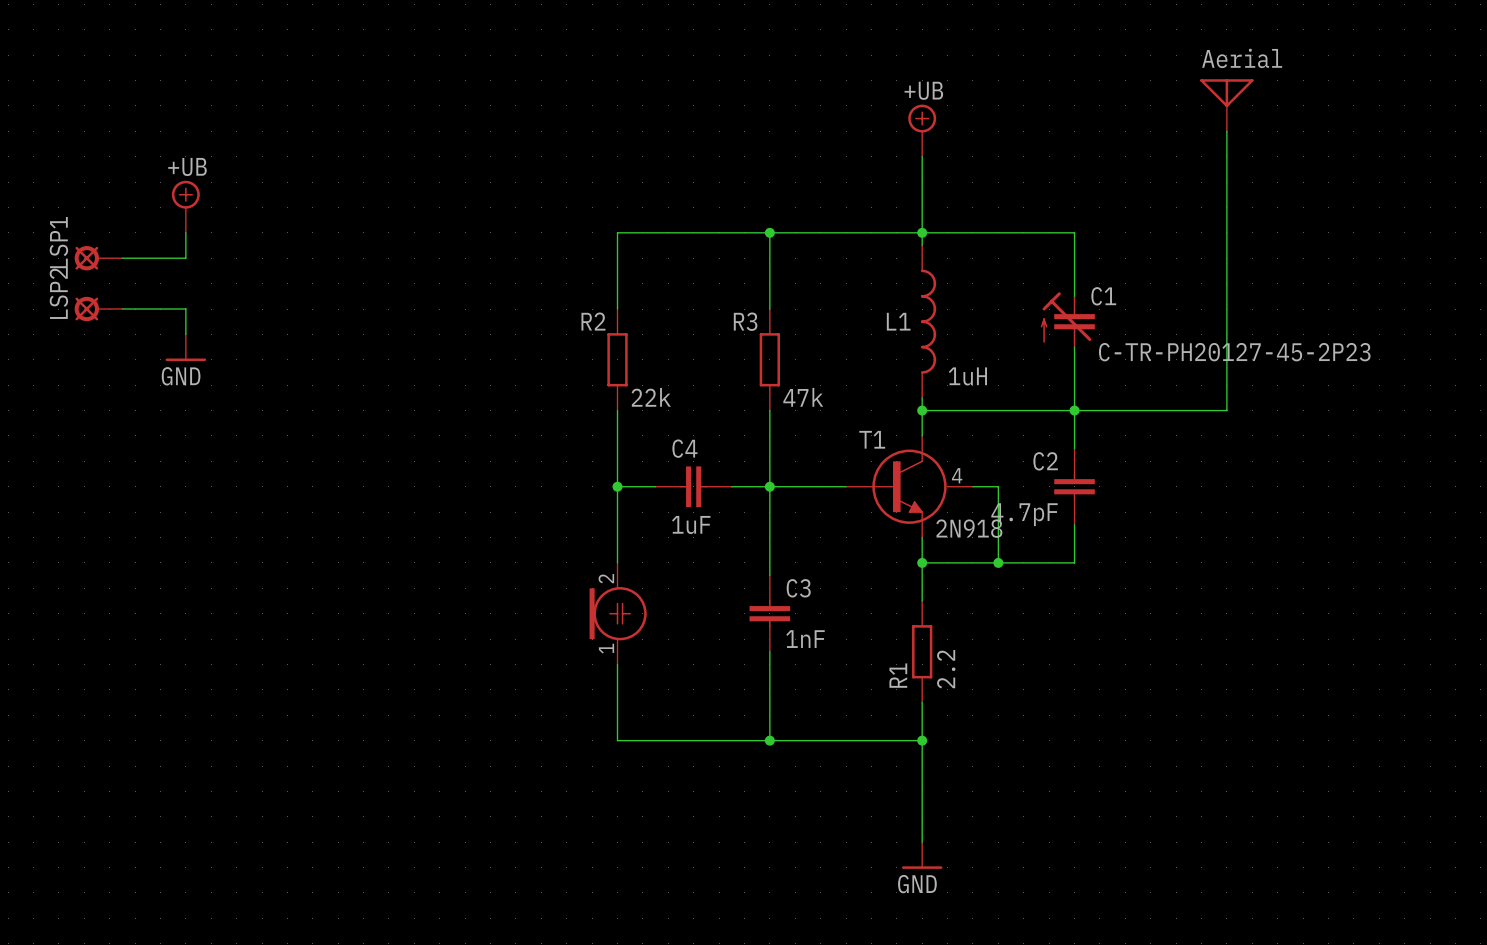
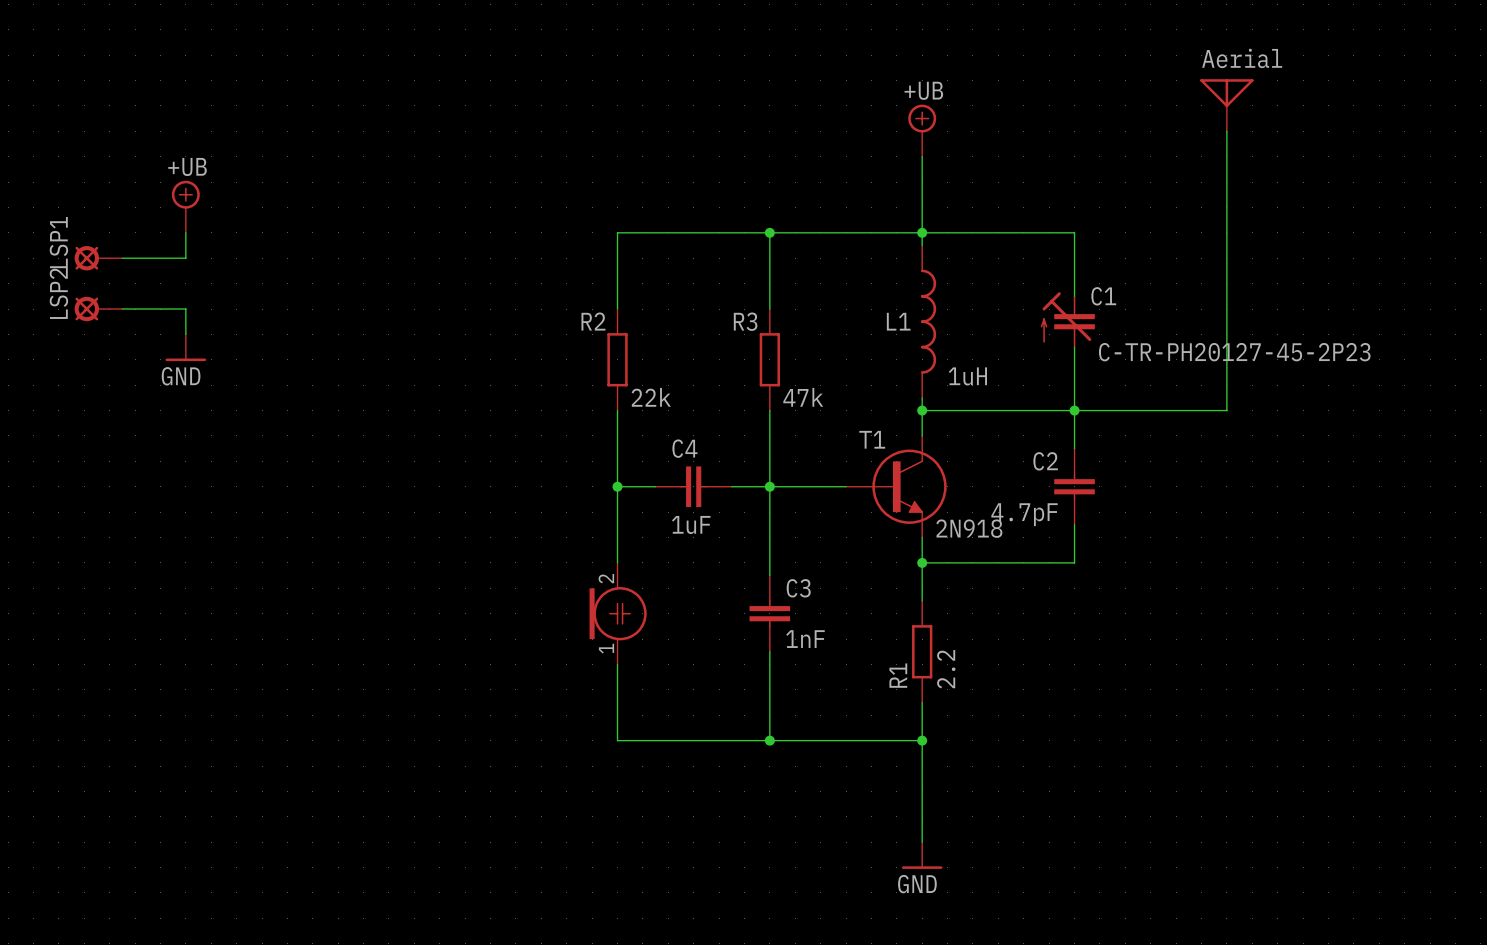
T1 symbol: [846, 435, 973, 538] -> [846, 435, 947, 538]
wire: (972, 486) (998, 486) (998, 562) -> none
junction: (998, 562) -> none

